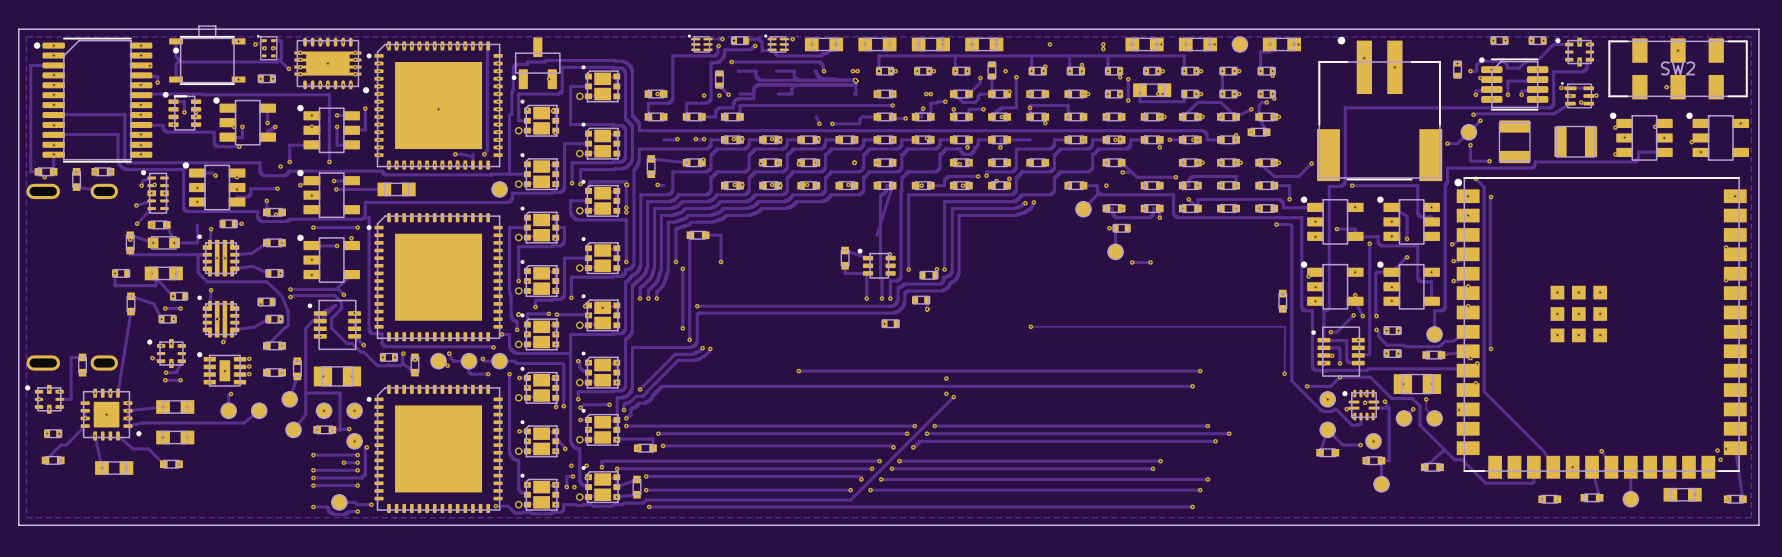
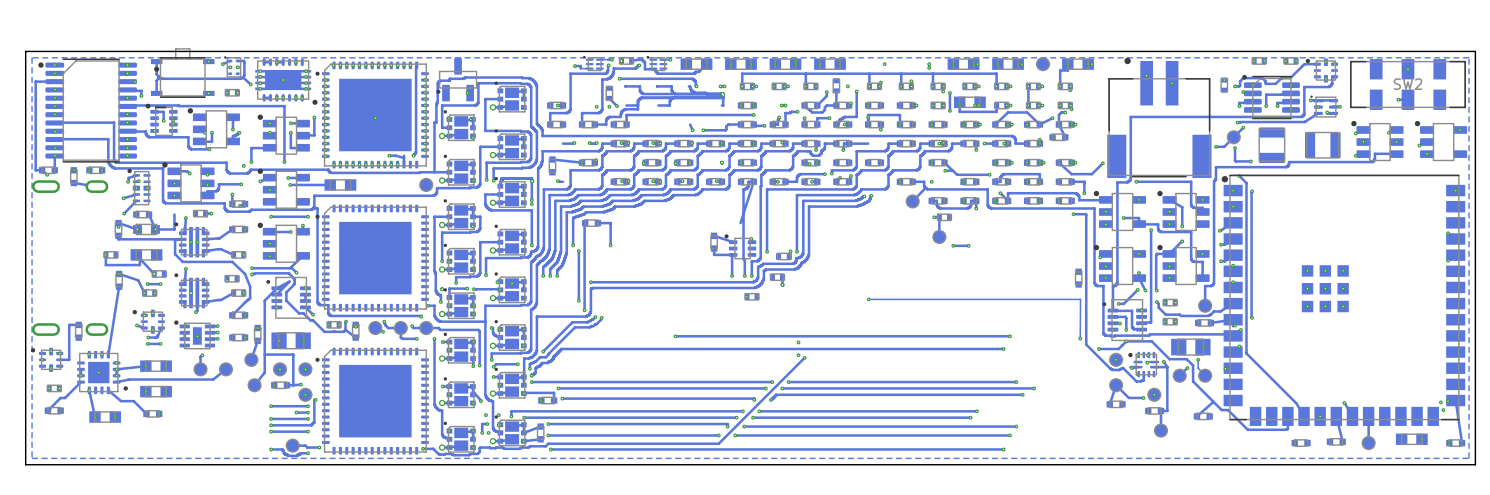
track: none -> (575, 66) (580, 66) (580, 68) (589, 68)
via: none -> (575, 66)

